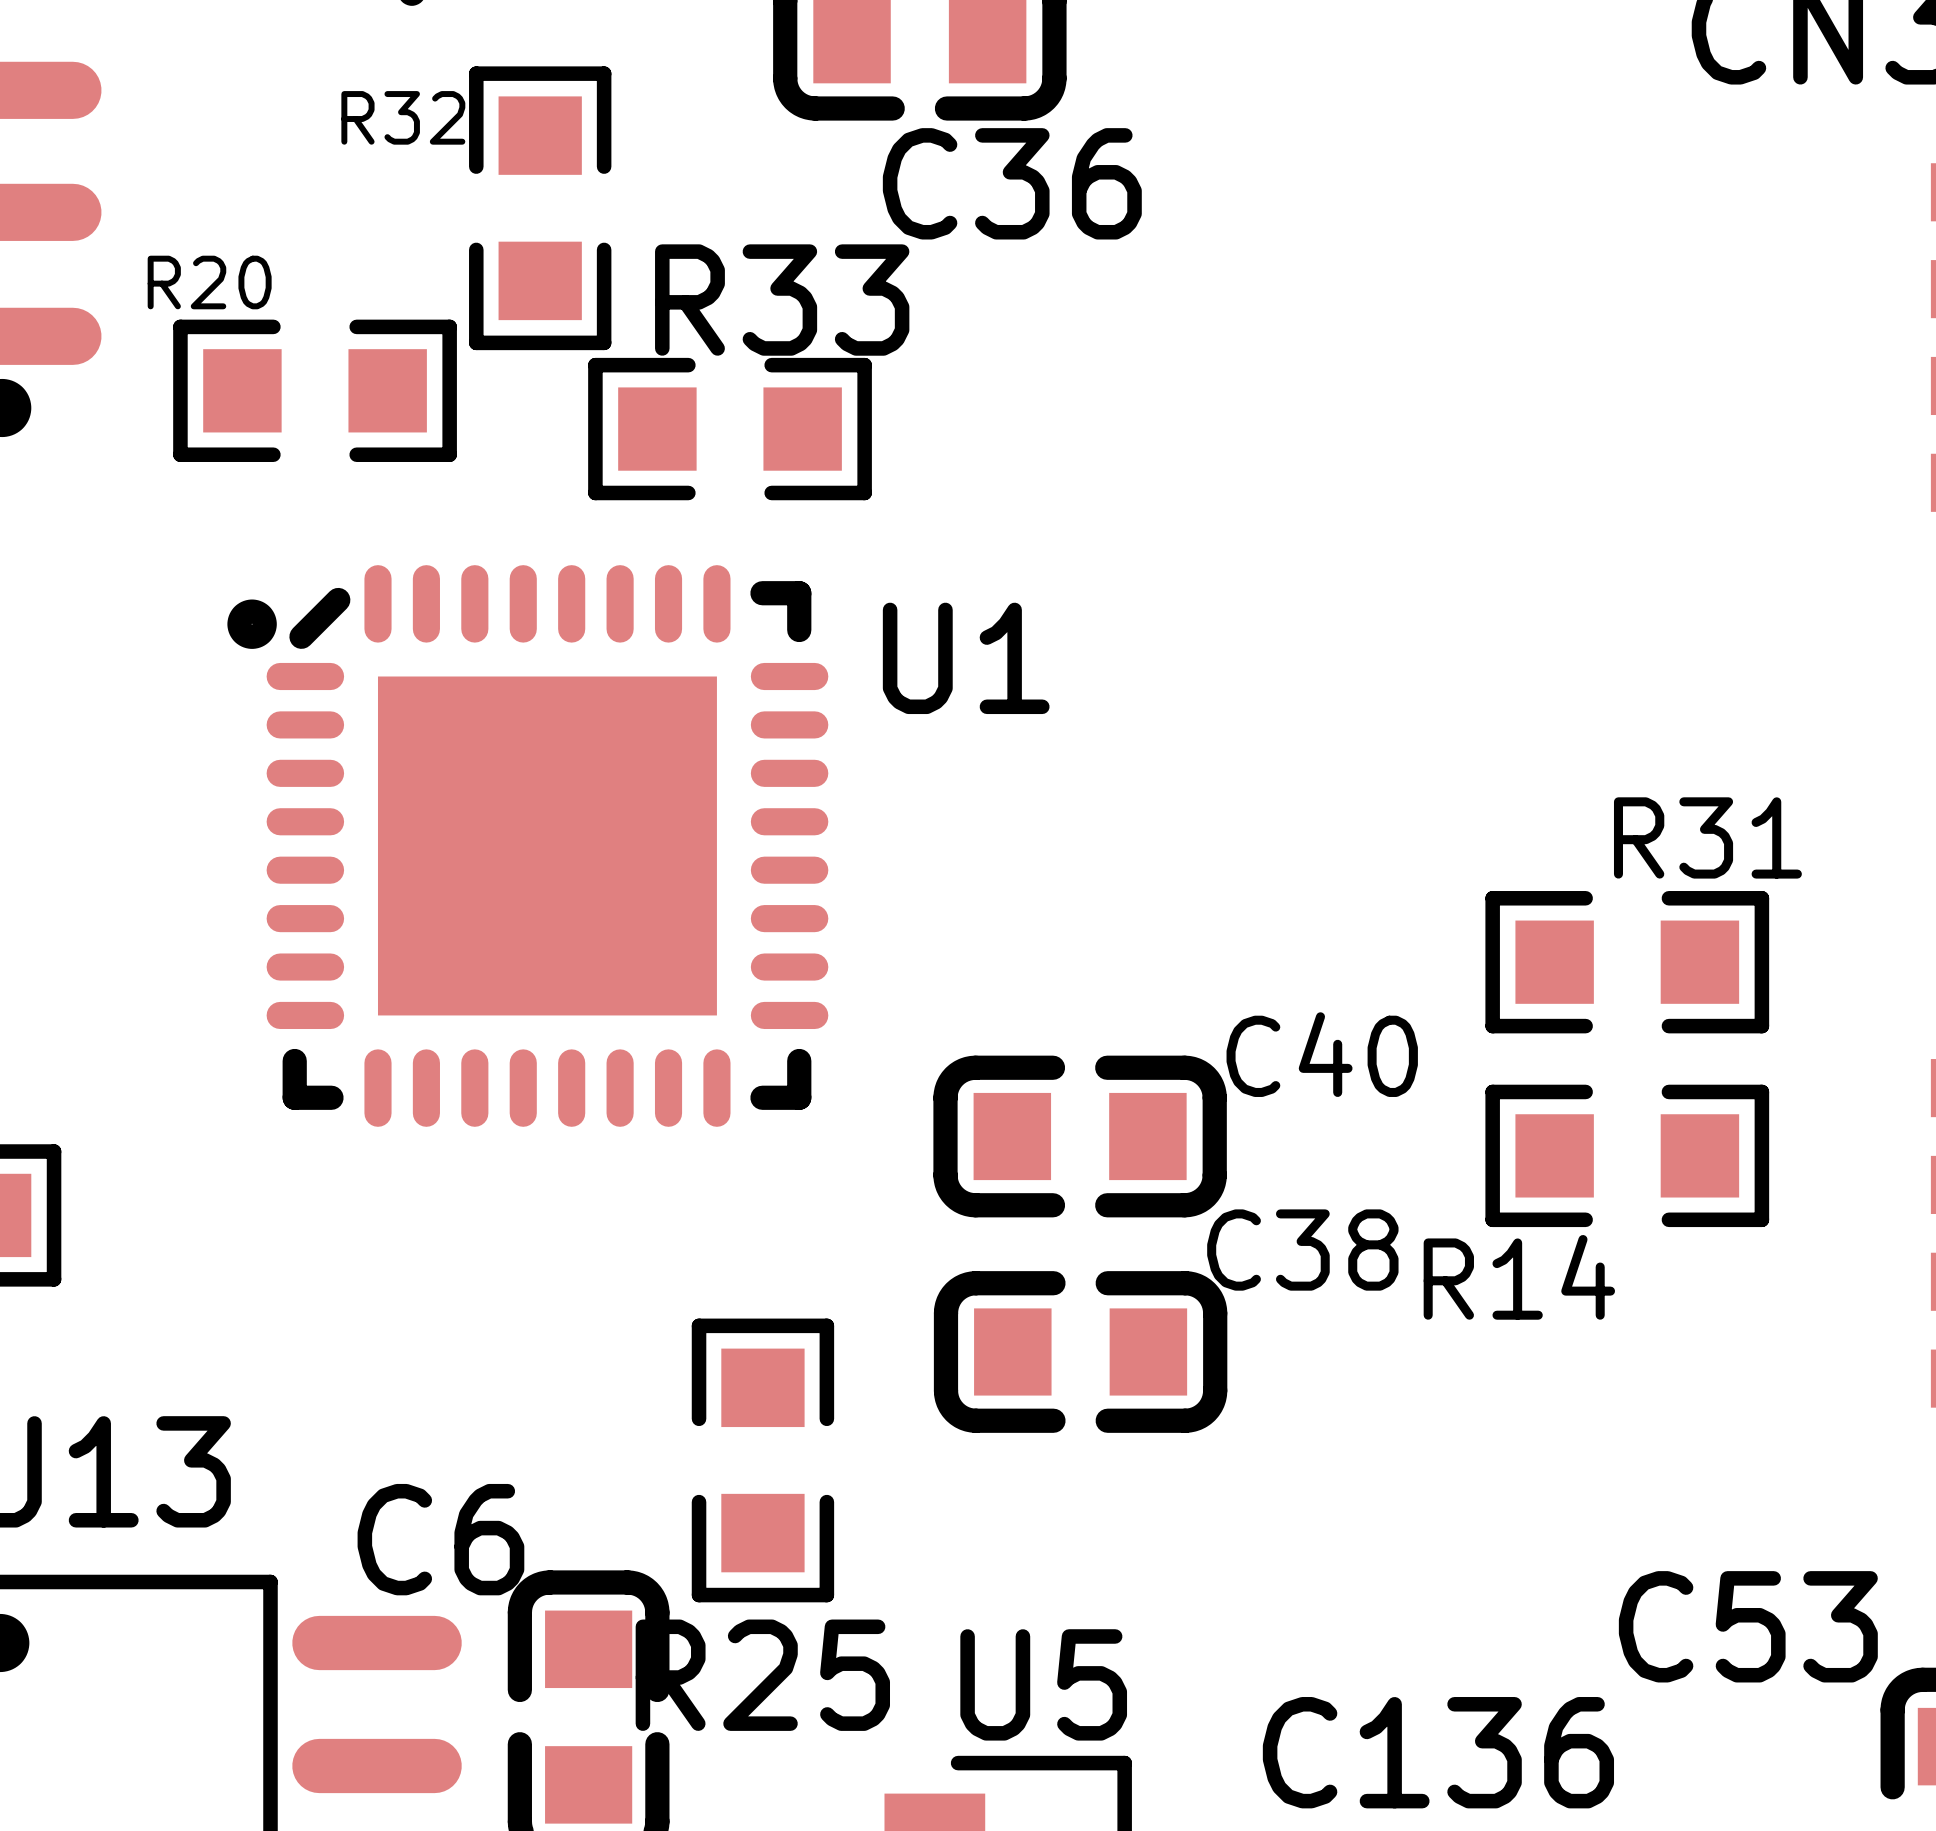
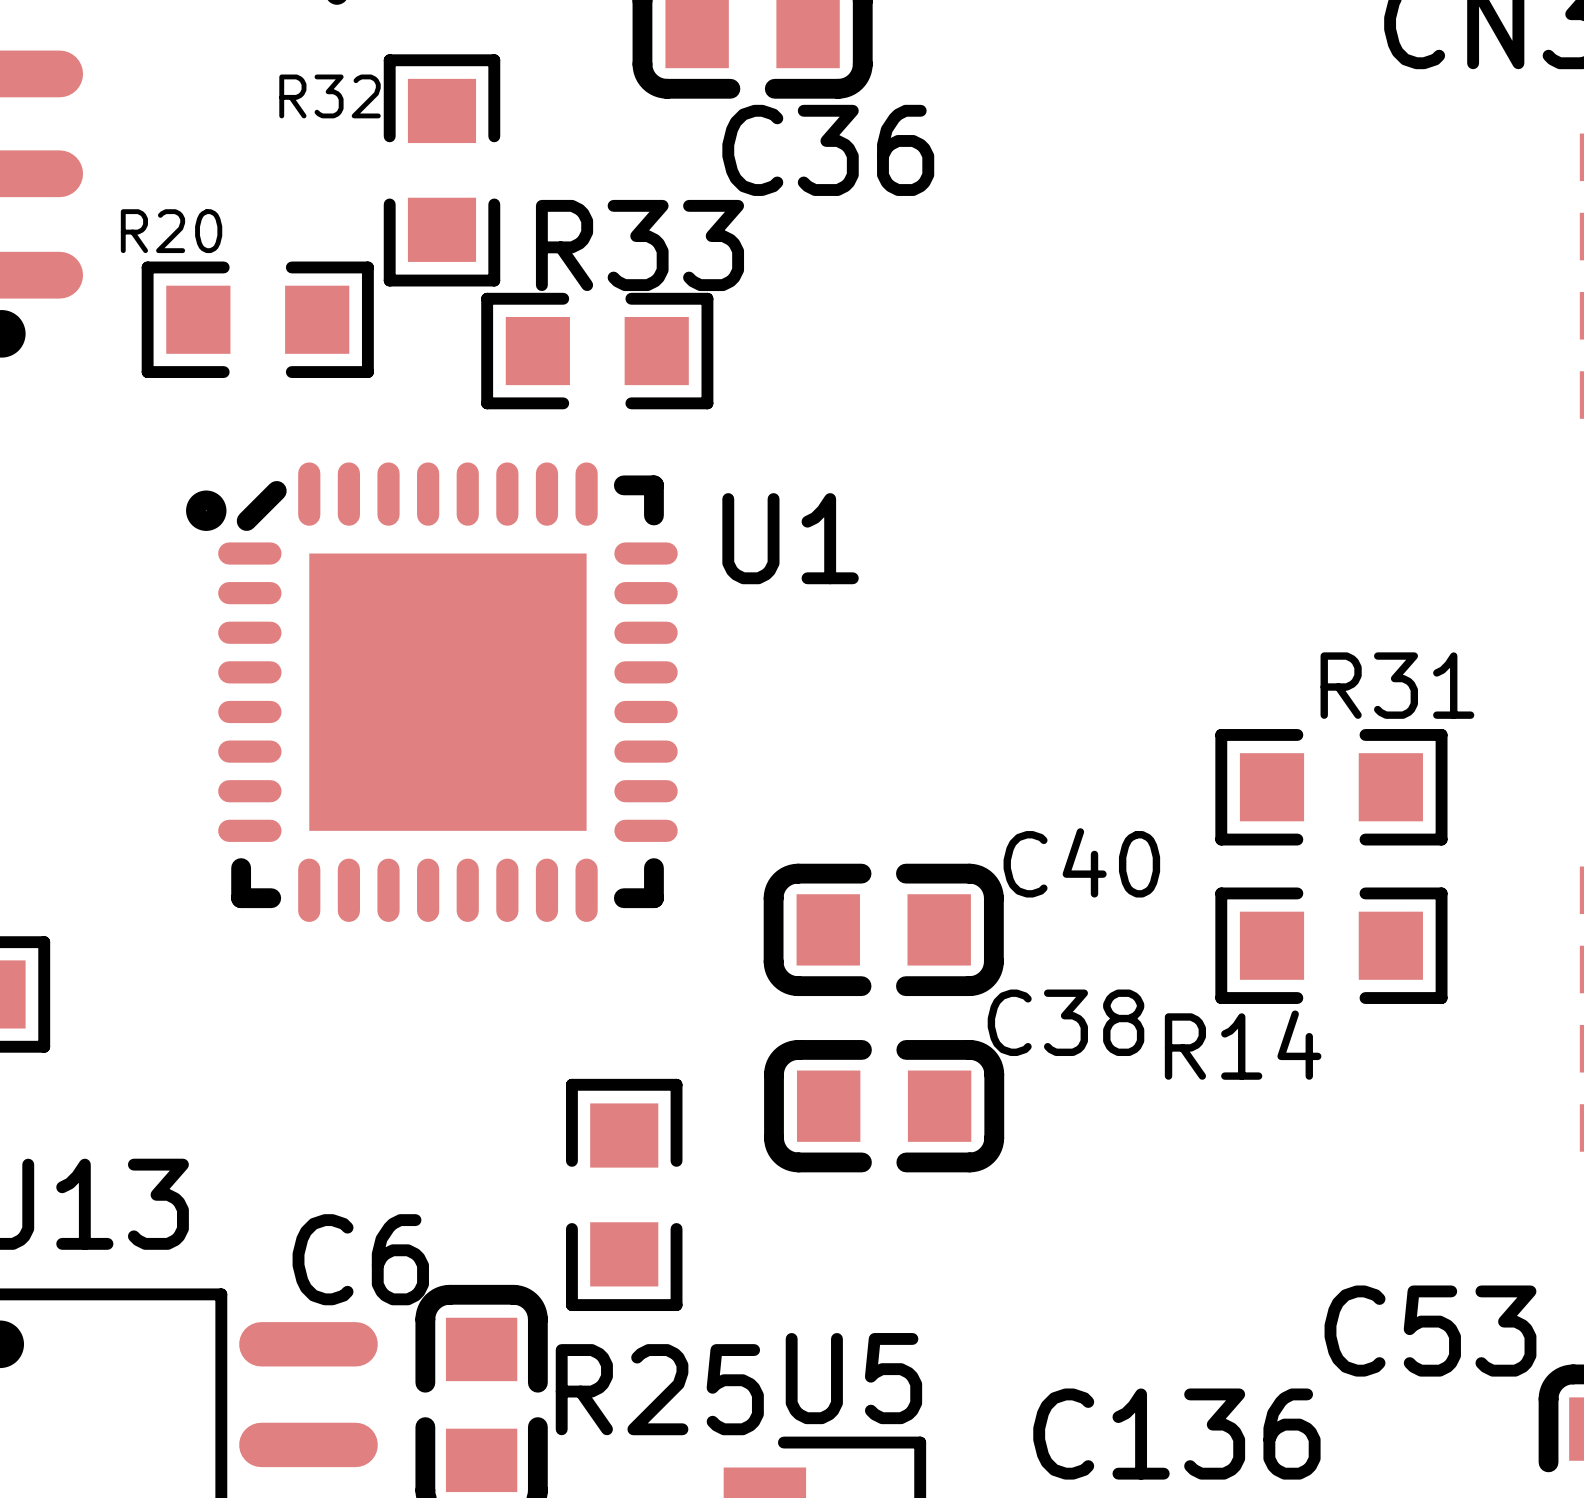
R25 name position: R25 (762, 1675) -> R25 (659, 1389)

